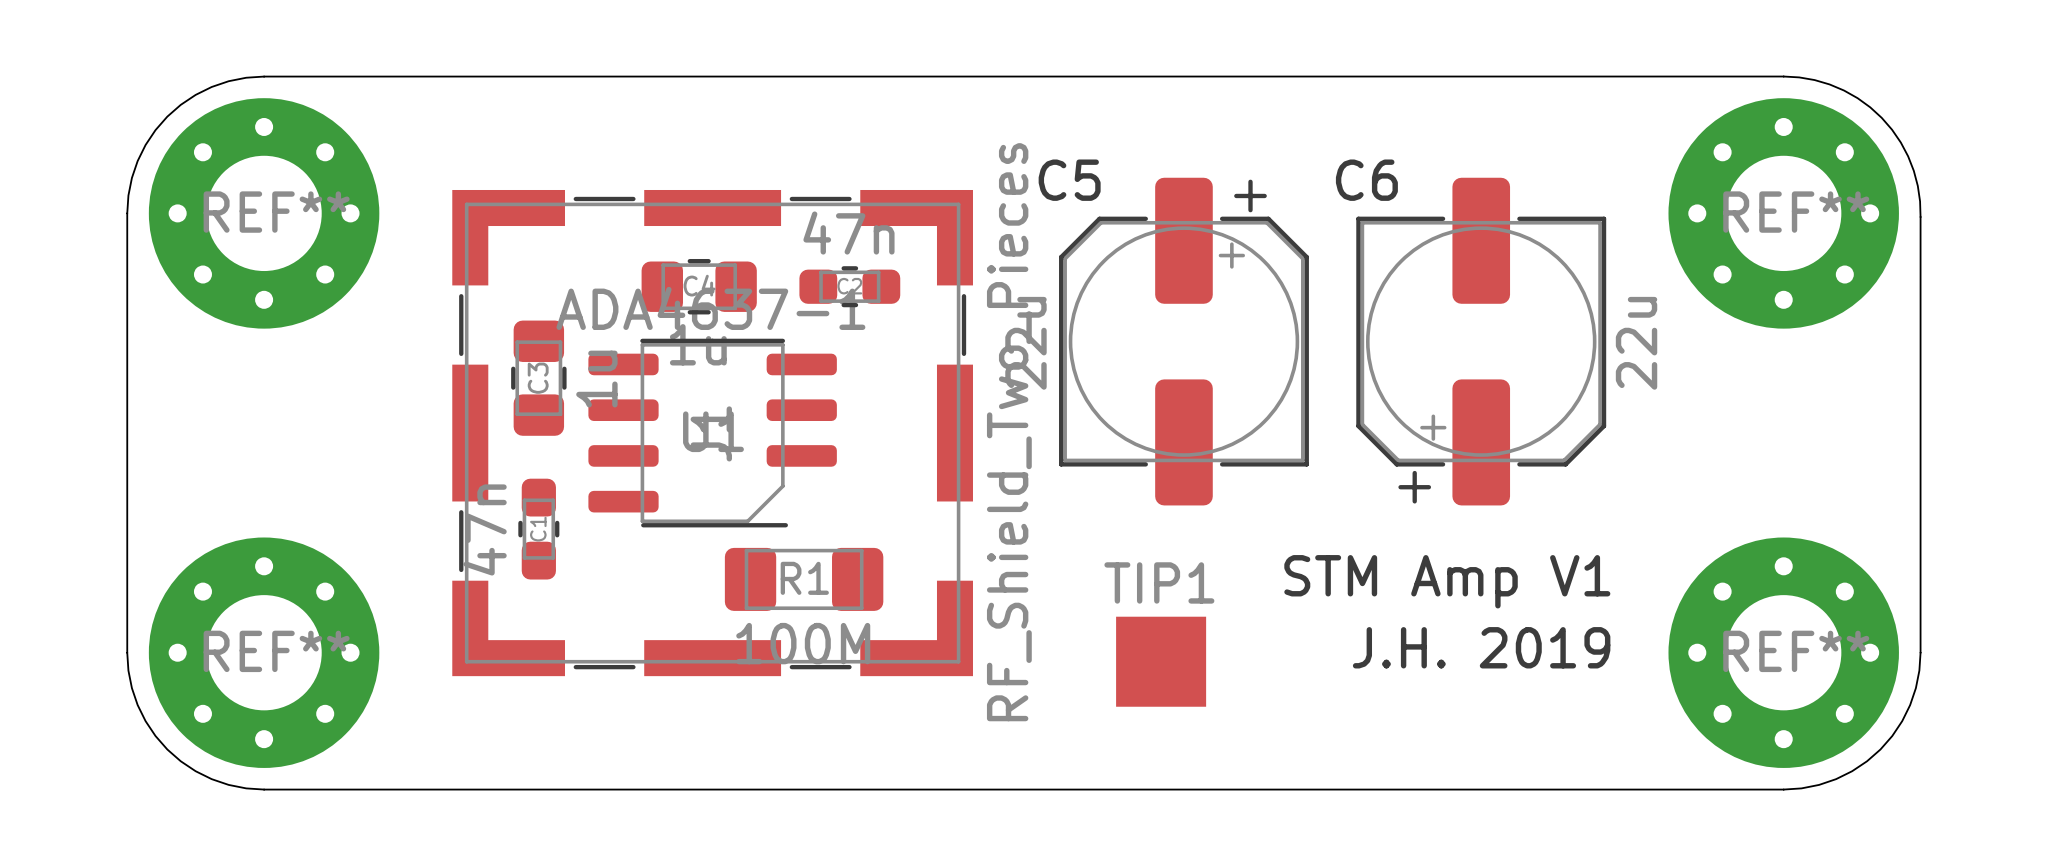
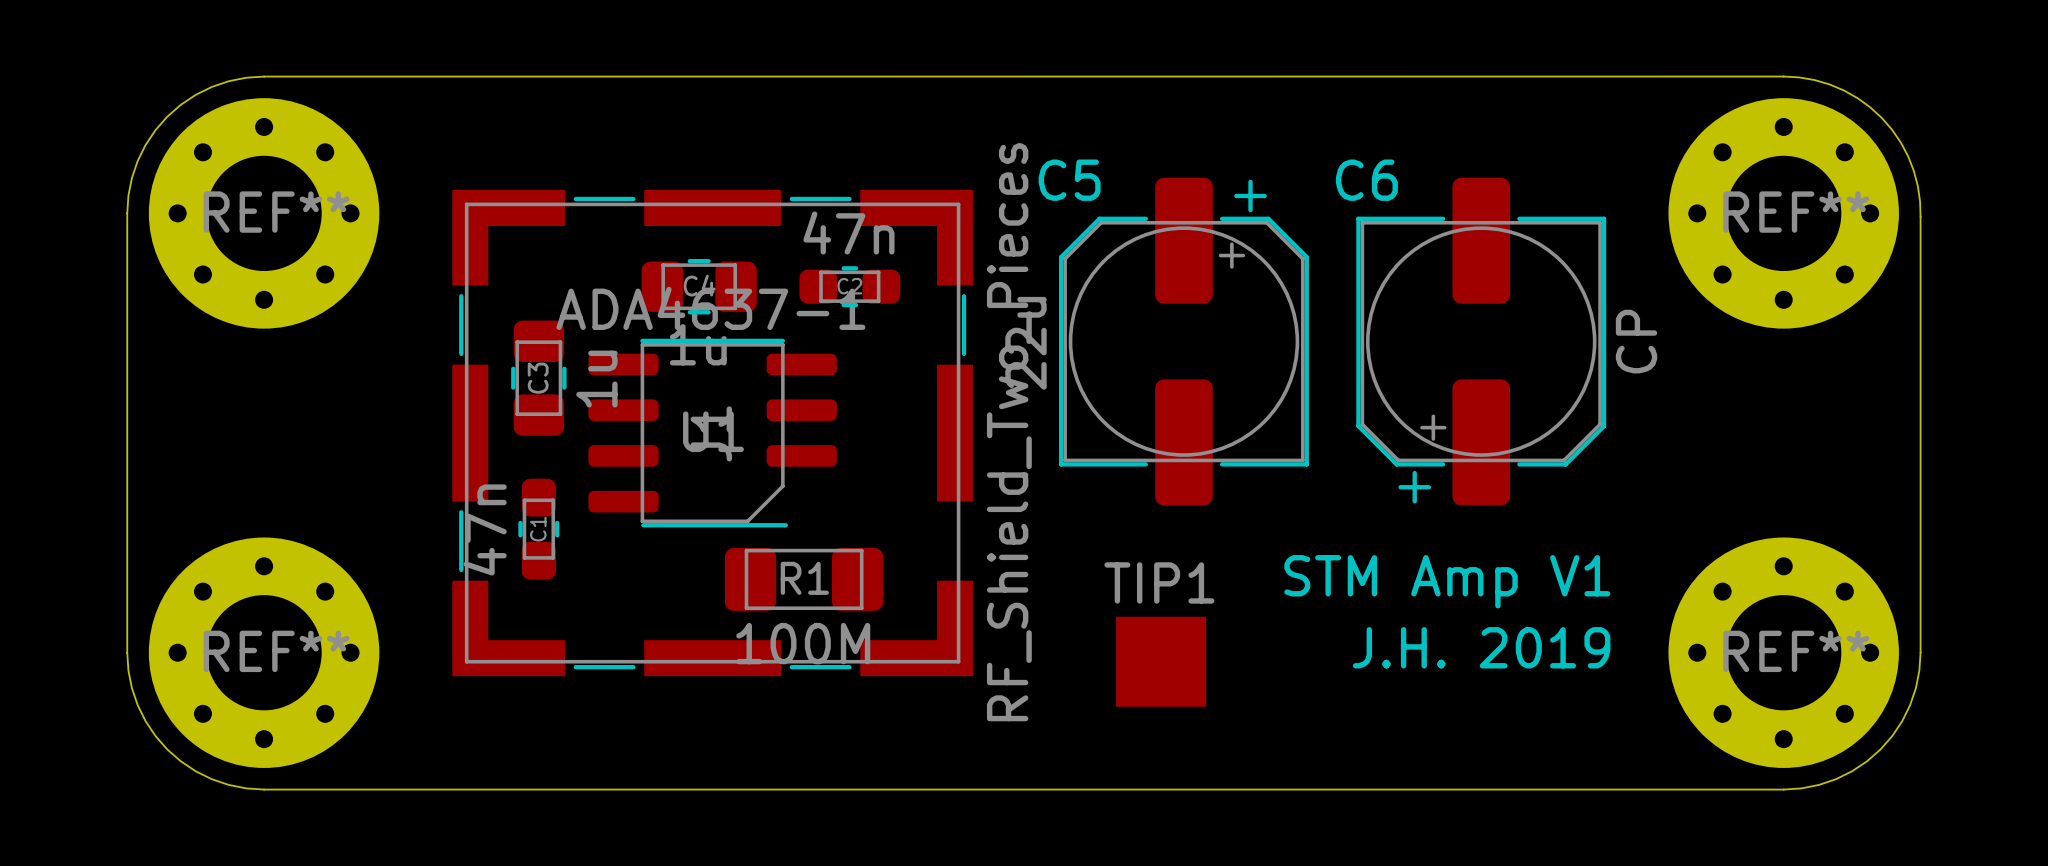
C6 value: 22u (1636, 343) -> CP (1636, 341)

